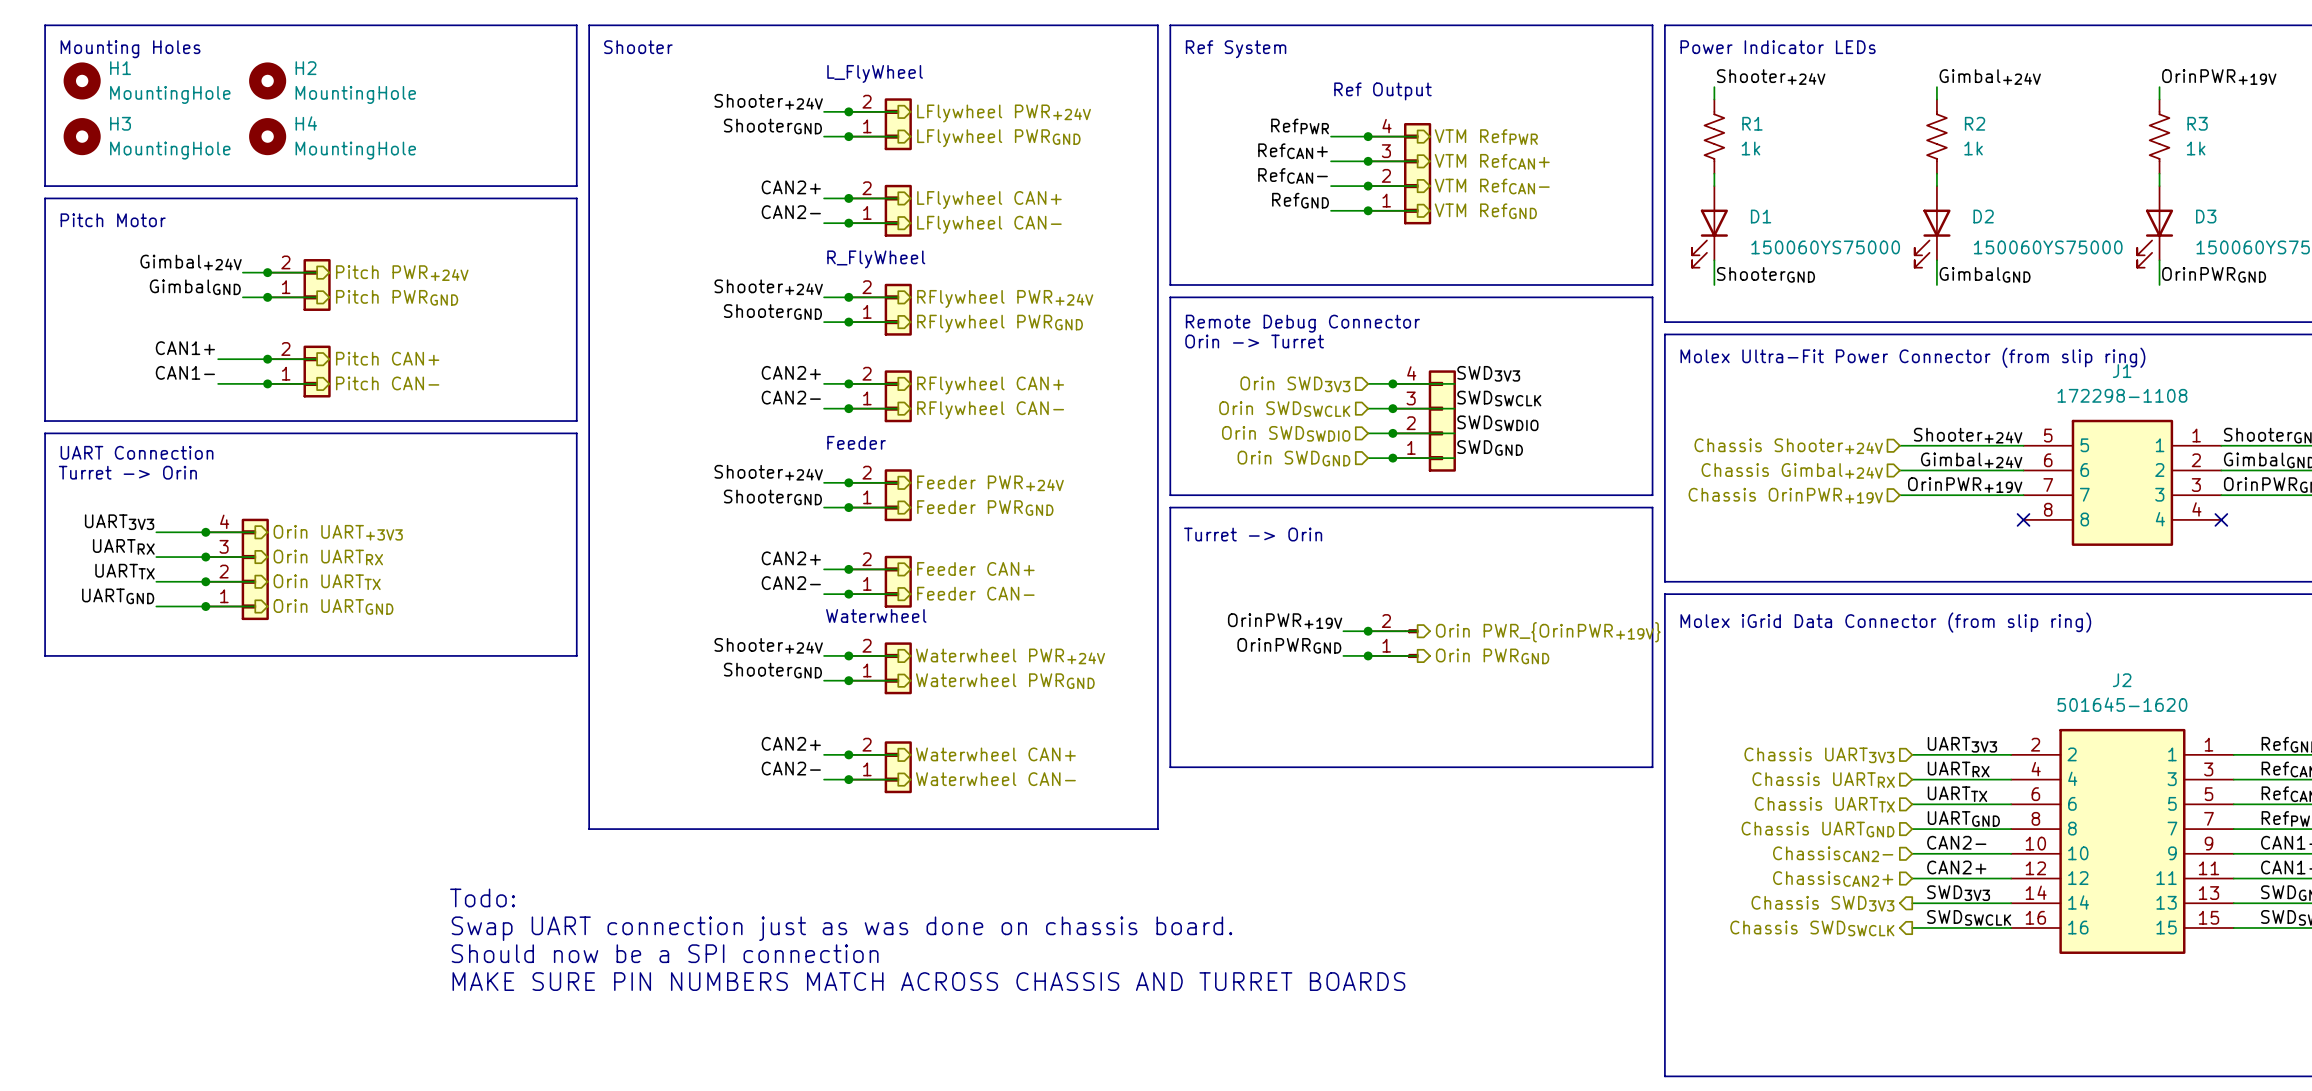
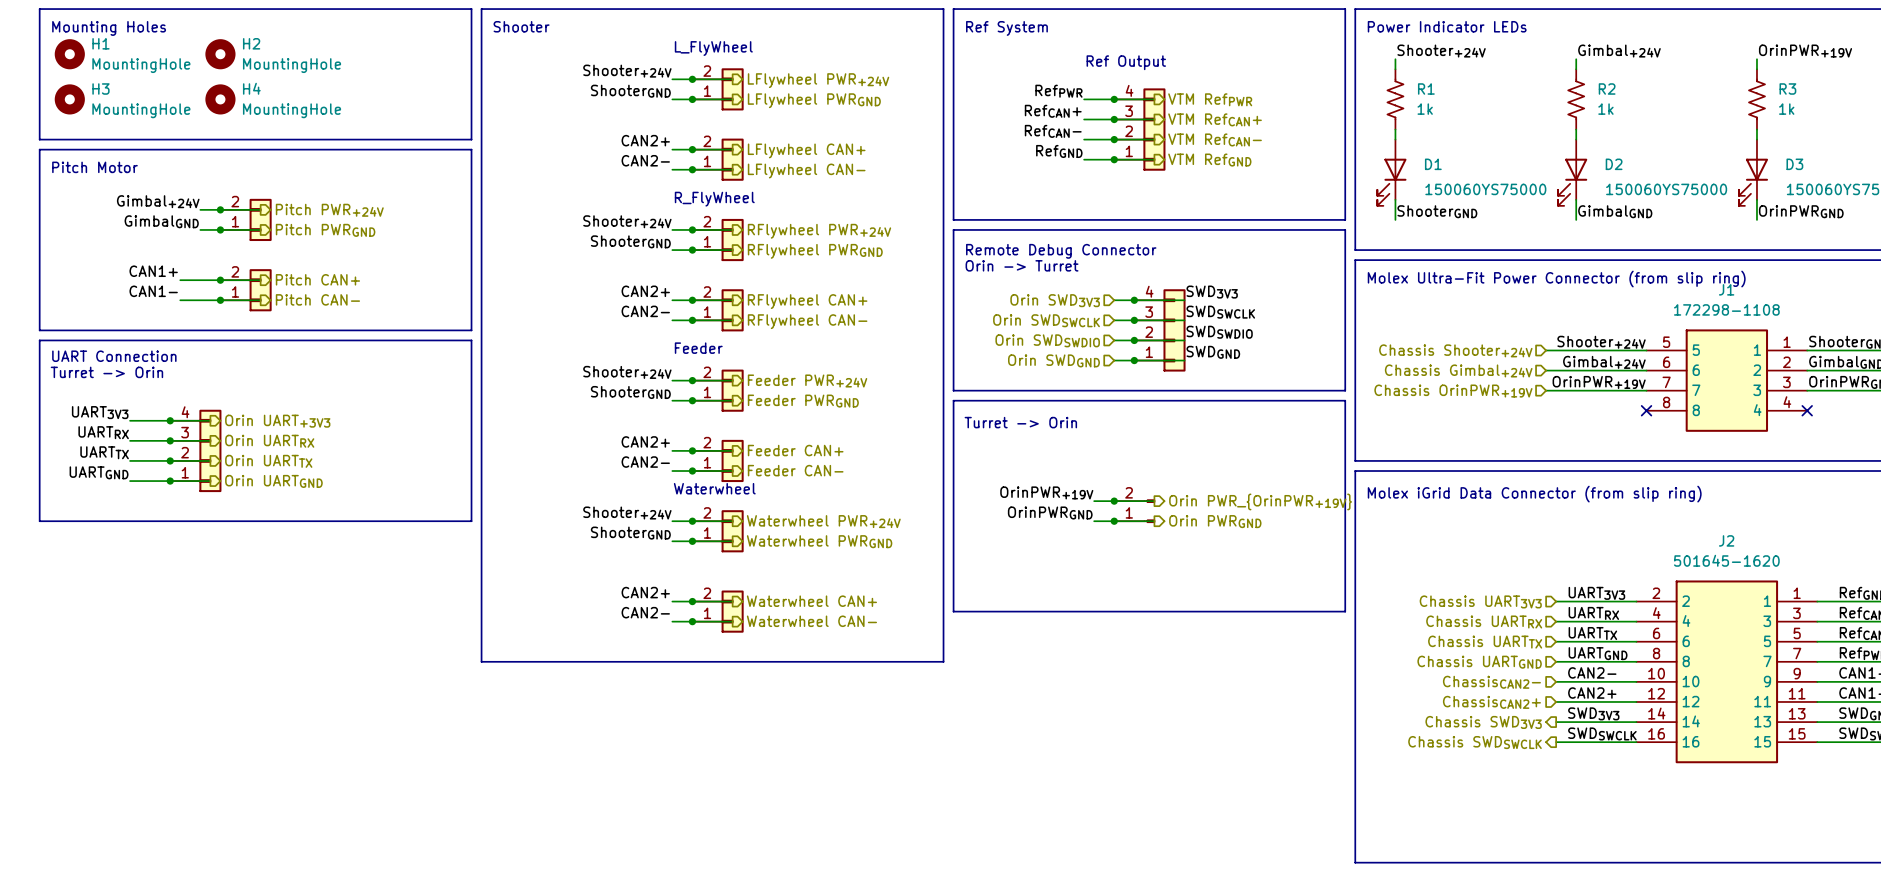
text: Todo: (482, 897) -> none
text: Swap UART connection just as was done on chassis board. (841, 928) -> none
text: Should now be a SPI connection (665, 953) -> none
text: MAKE SURE PIN NUMBERS MATCH ACROSS CHASSIS AND TURRET BOARDS (928, 981) -> none

